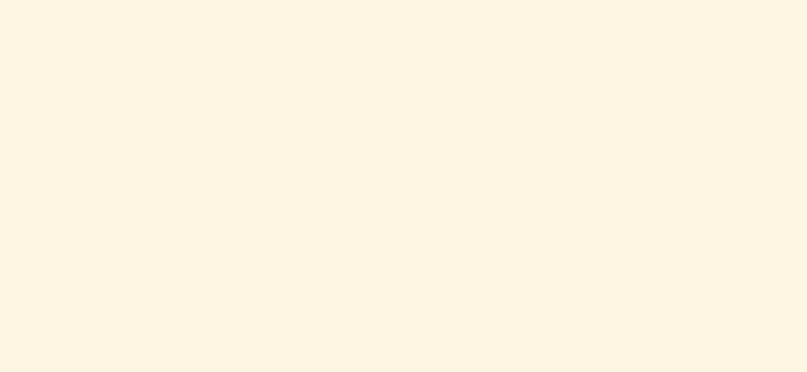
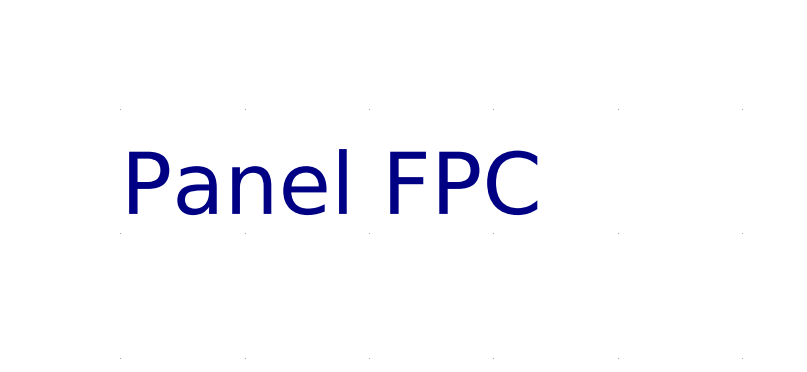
text: none -> Panel FPC (333, 182)

